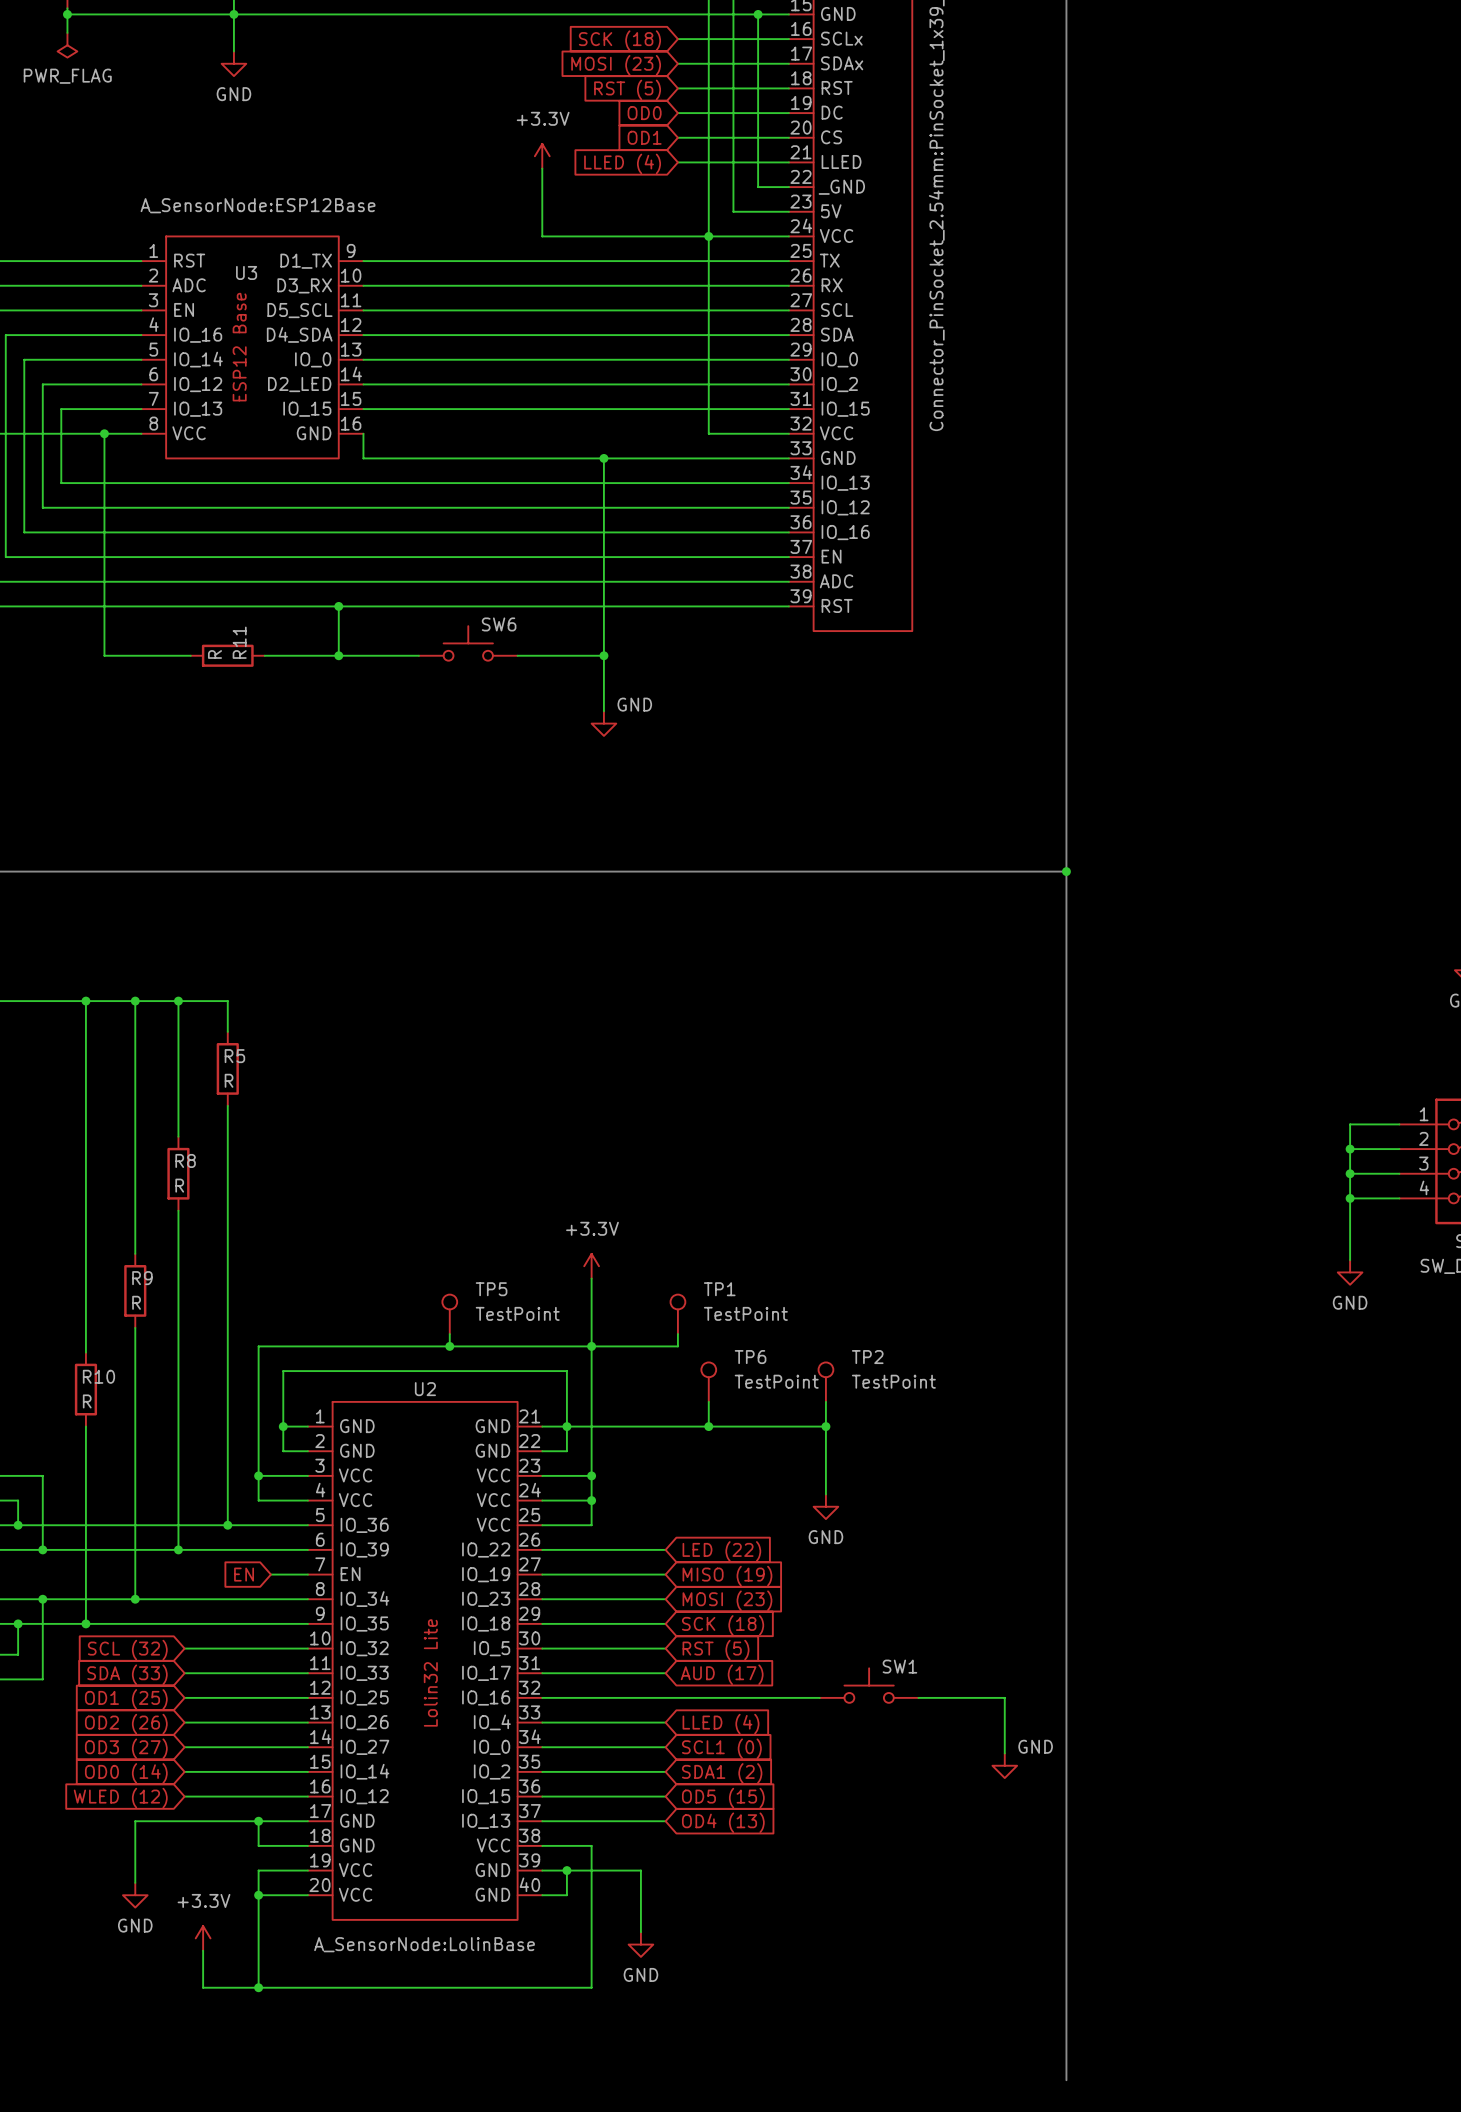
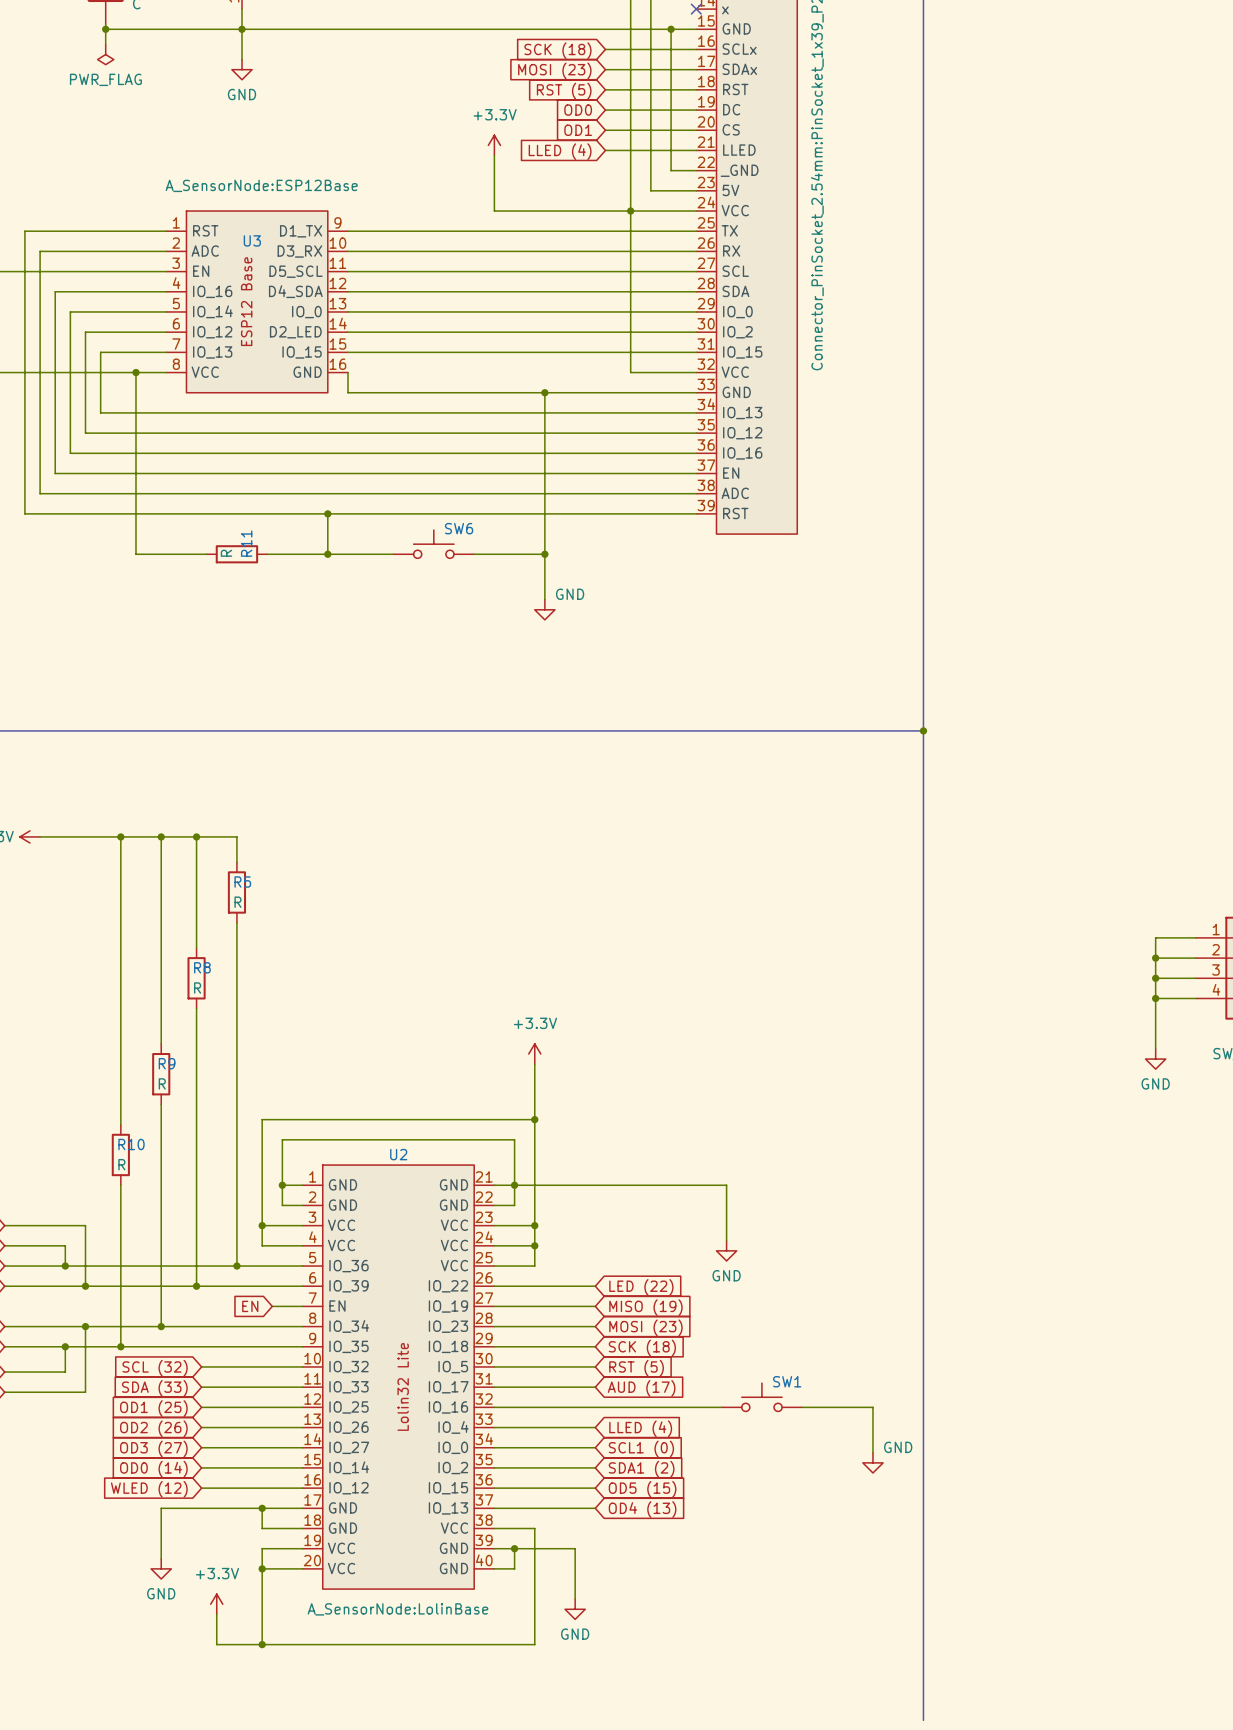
TP5: TestPoint (449, 1314) -> none
TP1: TestPoint (677, 1314) -> none
wire: (449, 1334) (449, 1346) -> none
wire: (677, 1334) (677, 1346) (591, 1346) -> none
junction: (449, 1346) -> none
TP6: TestPoint (708, 1382) -> none
TP2: TestPoint (825, 1382) -> none
wire: (708, 1401) (708, 1426) -> none
wire: (825, 1401) (825, 1426) -> none
junction: (708, 1426) -> none
junction: (825, 1426) -> none

